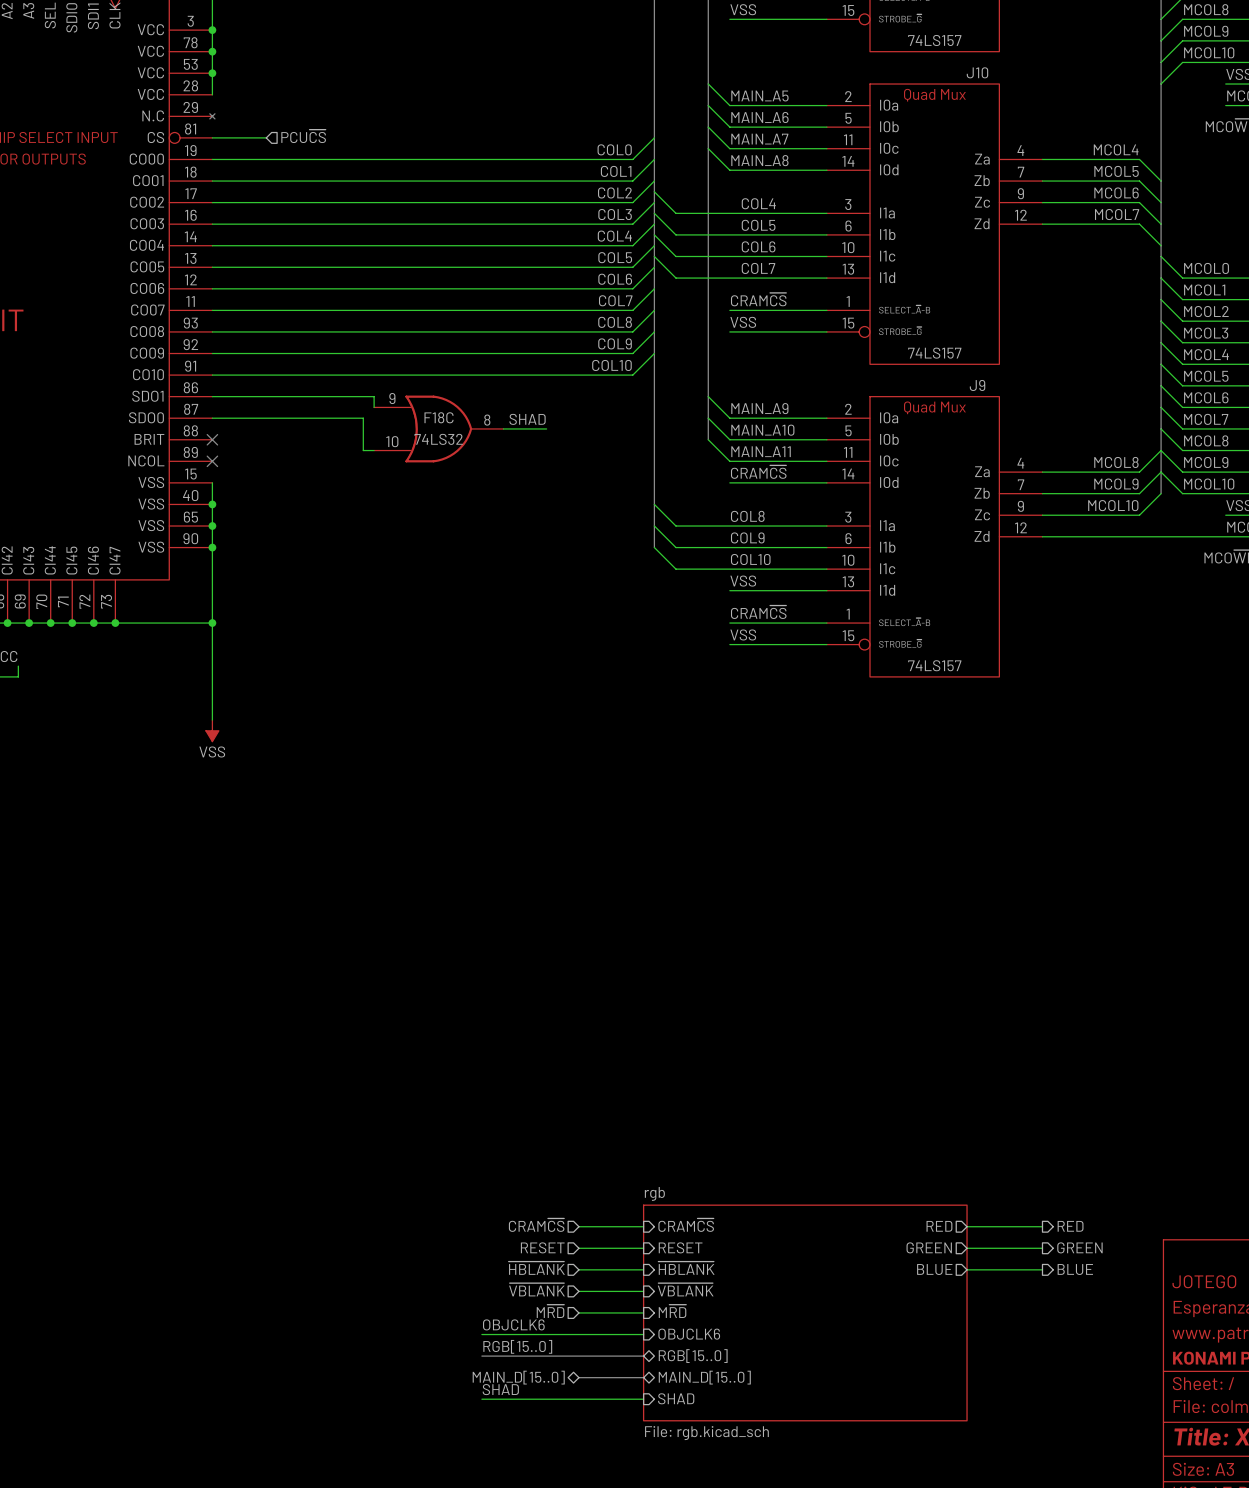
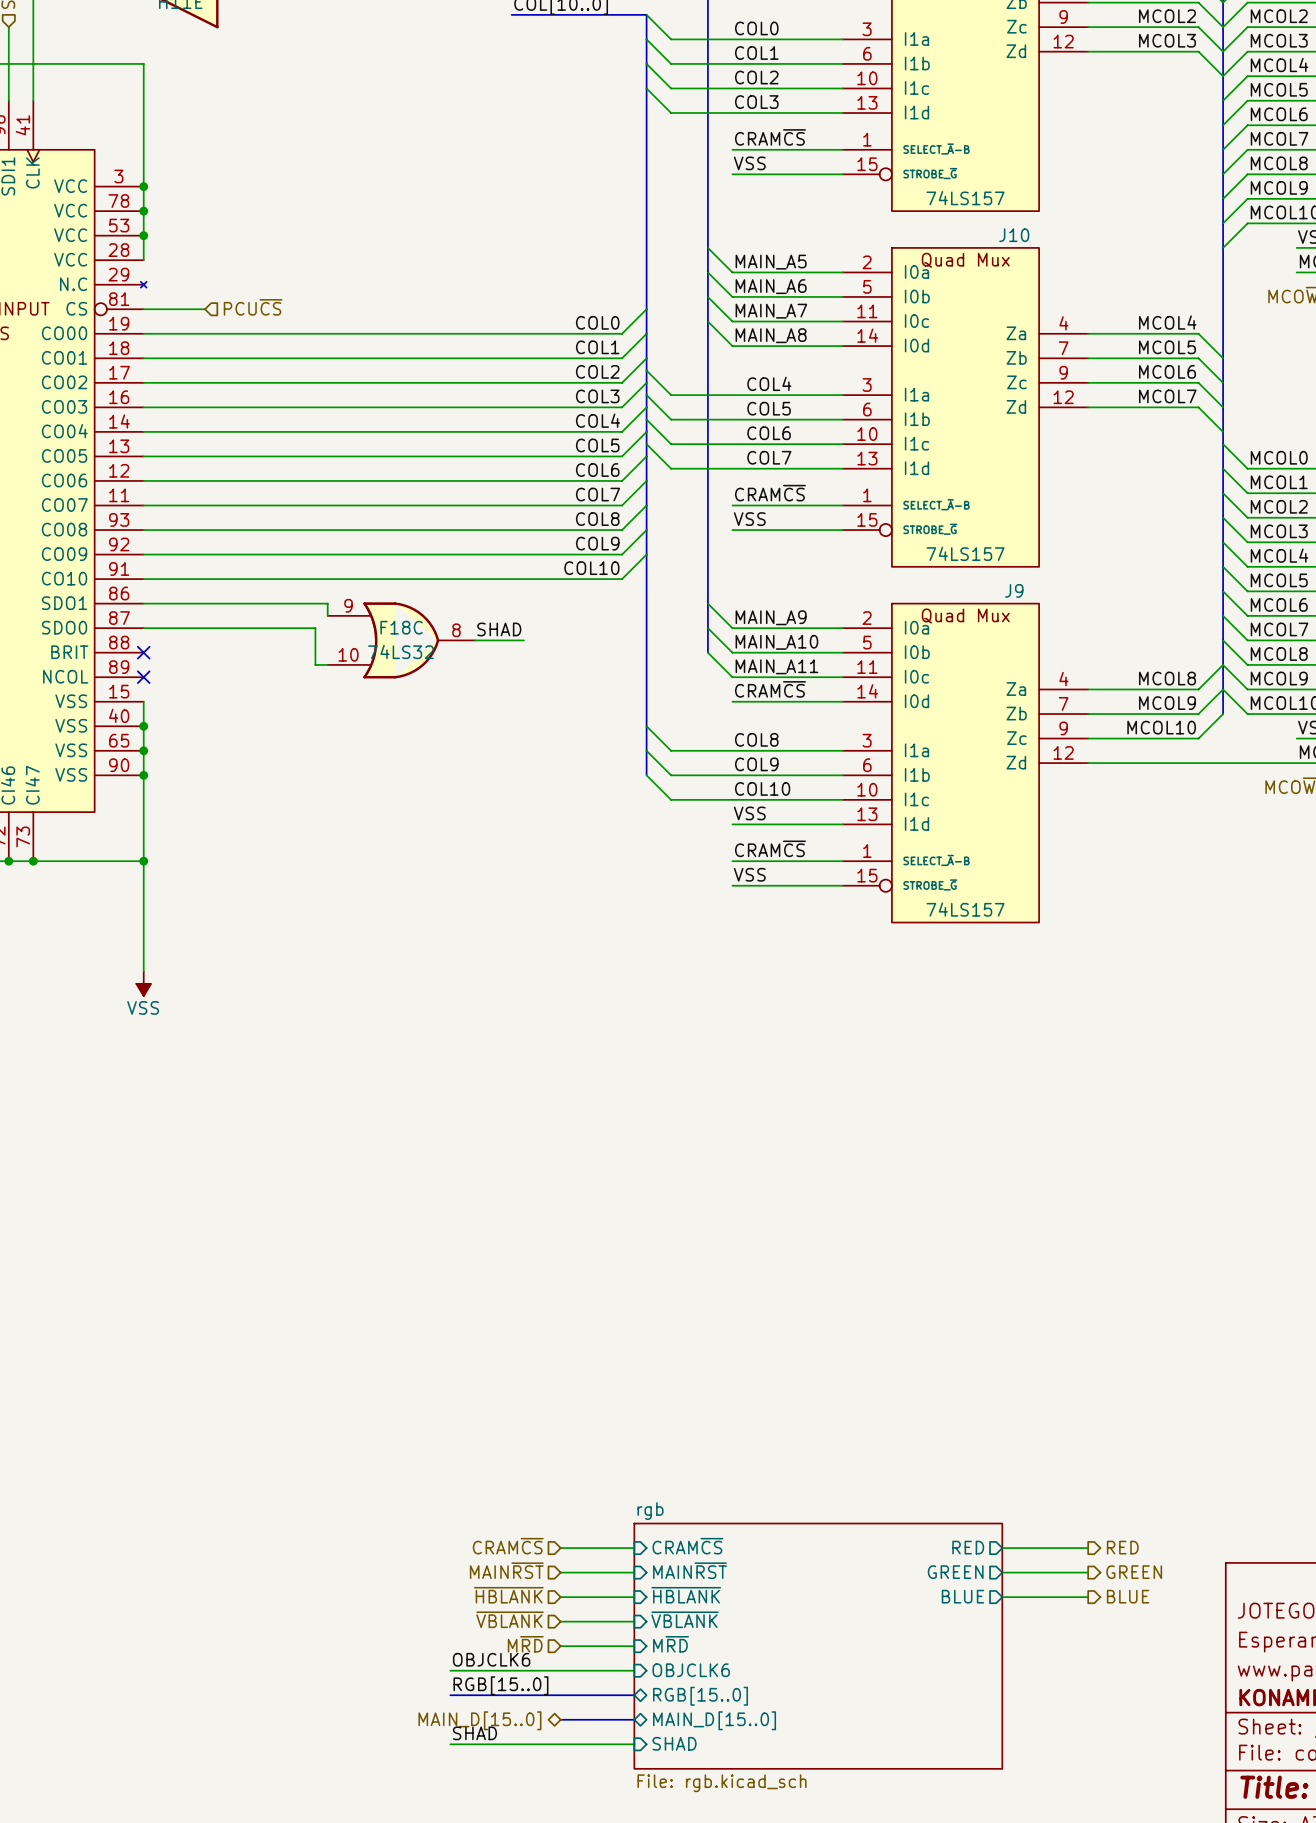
hierarchical label: RESET (542, 1247) -> MAIN~{RST} (506, 1570)
sheet pin: RESET (680, 1247) -> MAIN~{RST} (690, 1570)

